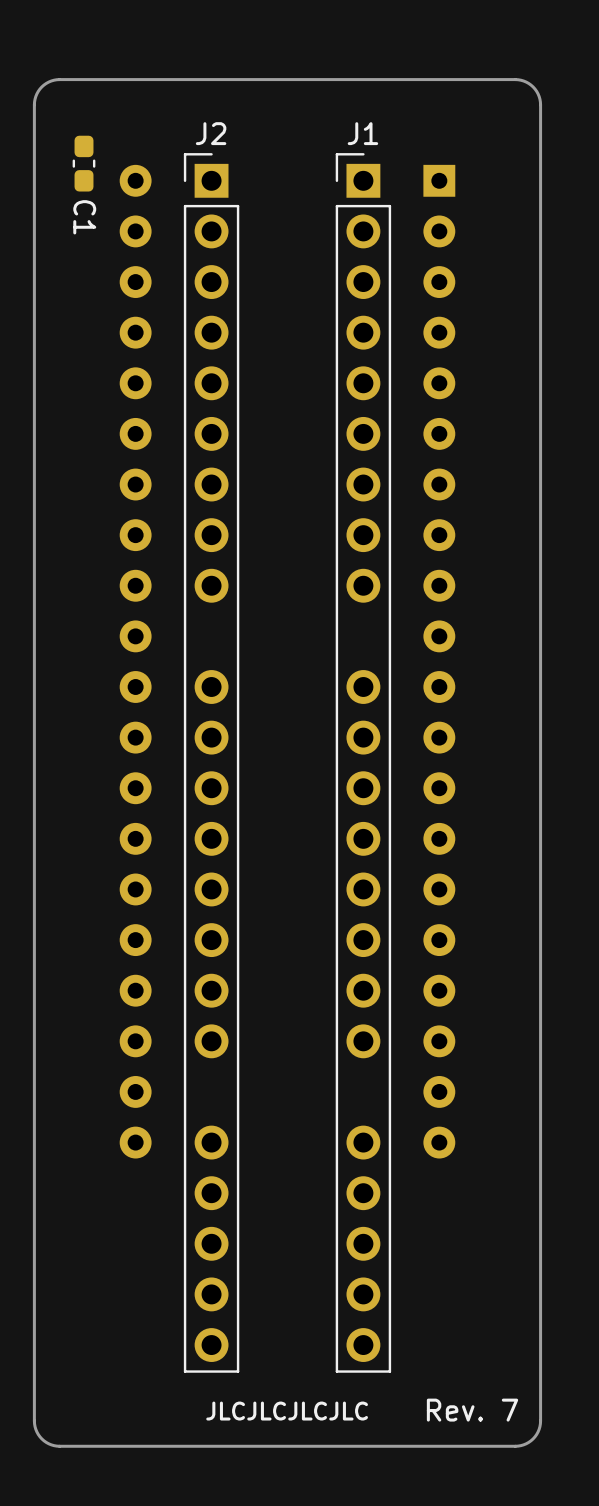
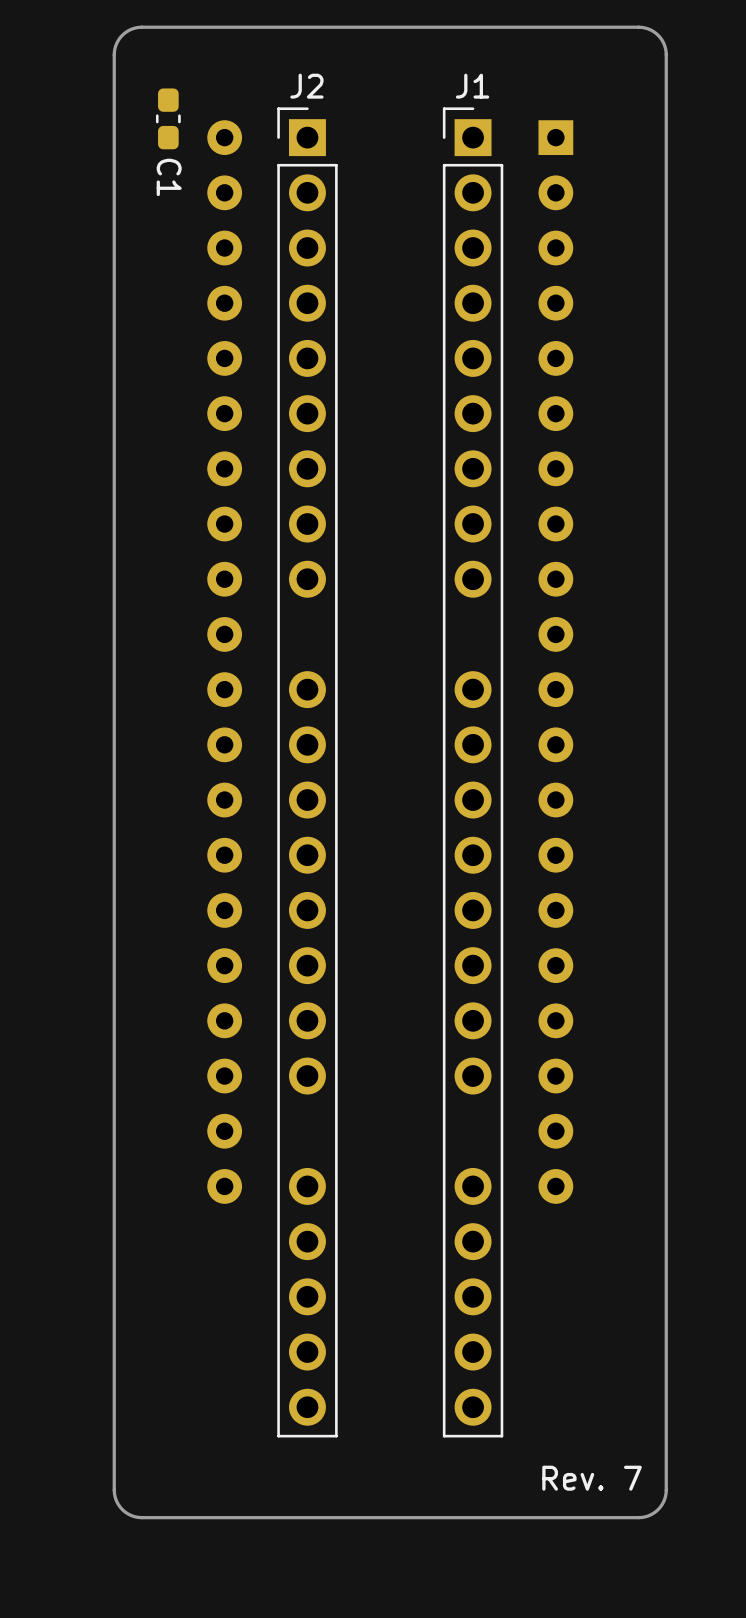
text: JLCJLCJLCJLC (287, 1411) -> none

